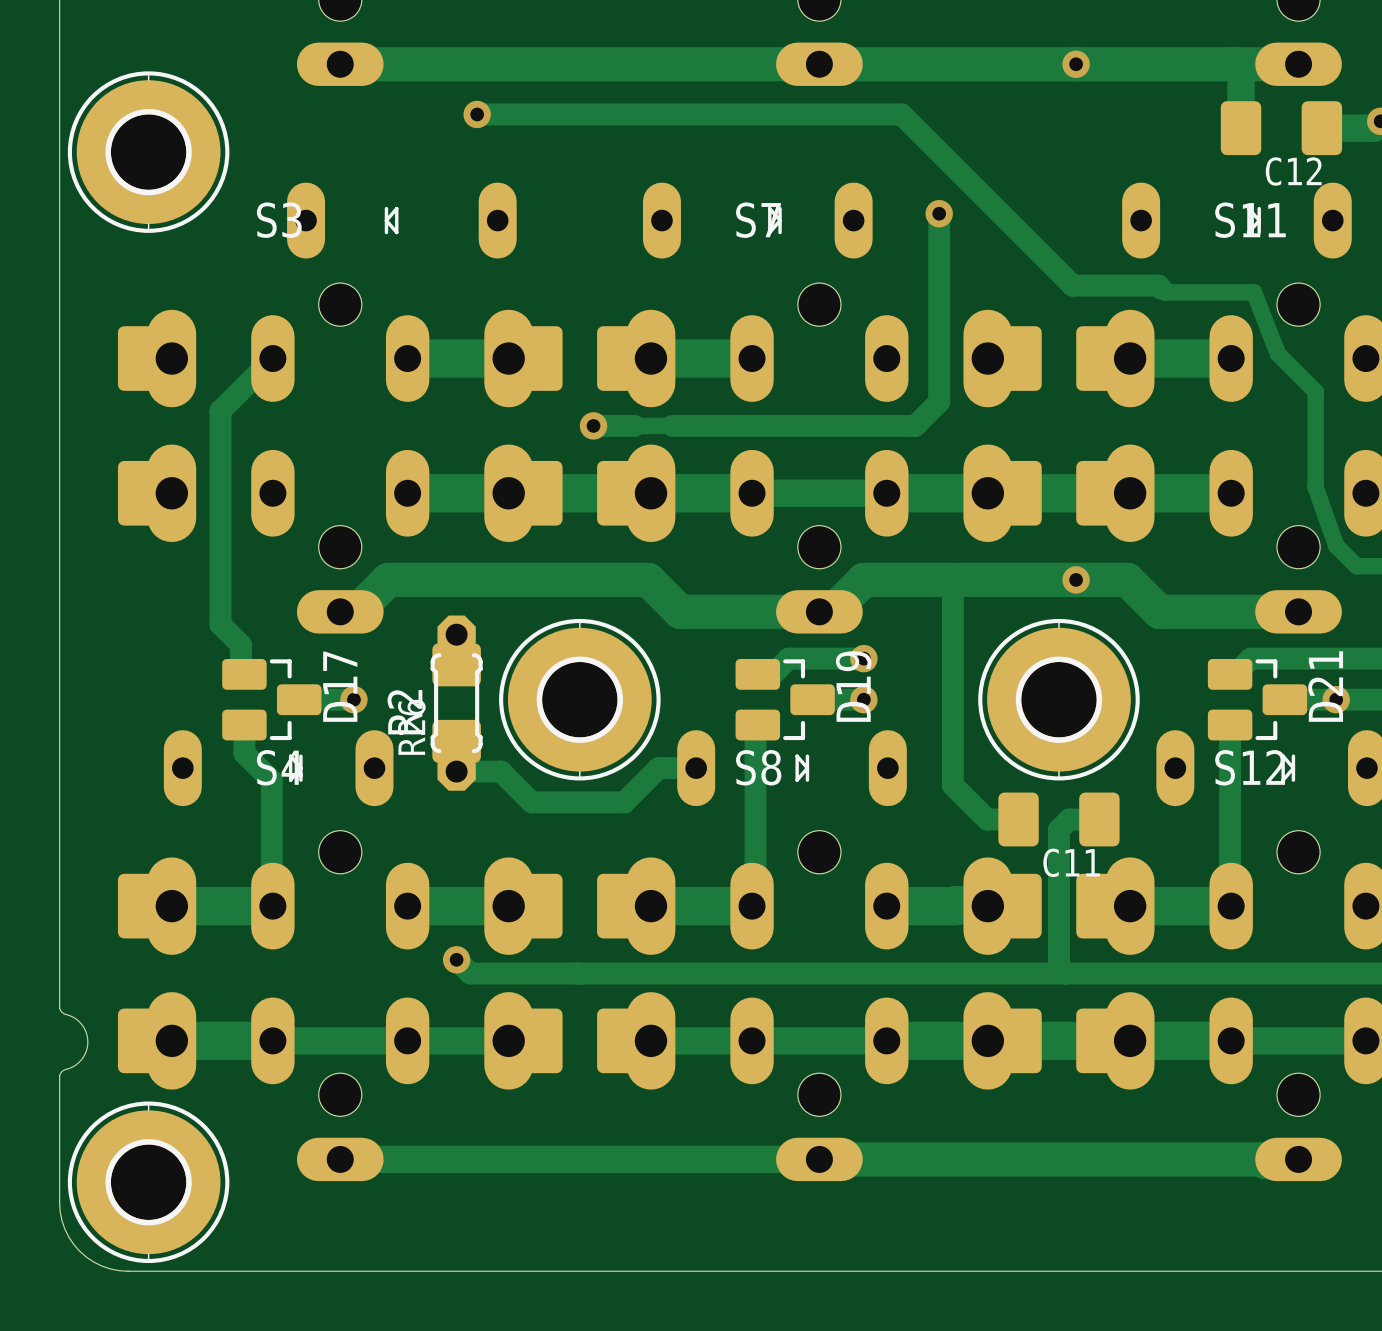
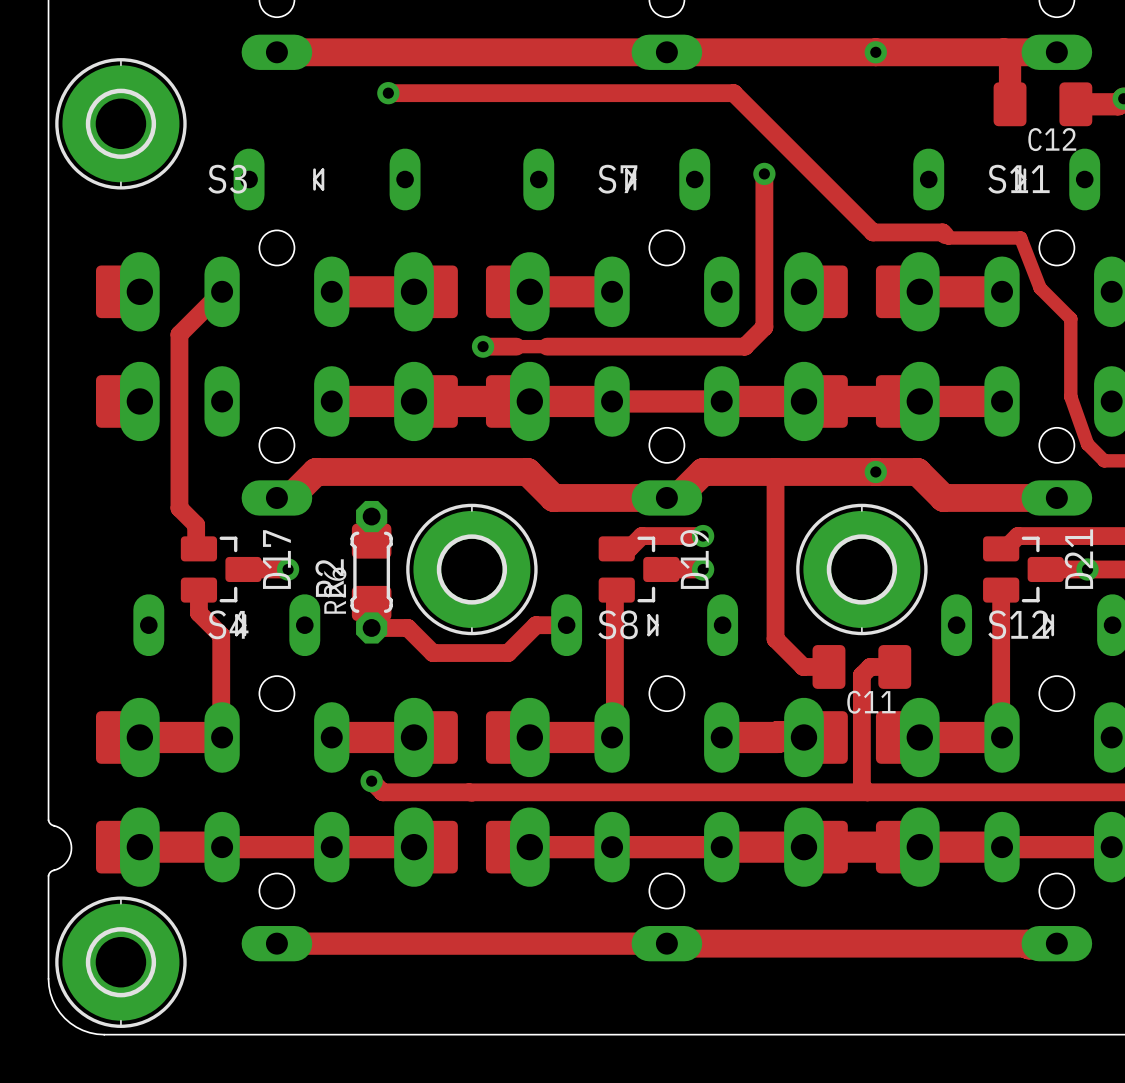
part footprint: [67, 71, 230, 233] -> [55, 58, 187, 190]
part footprint: [67, 1101, 230, 1264] -> [55, 896, 187, 1028]

